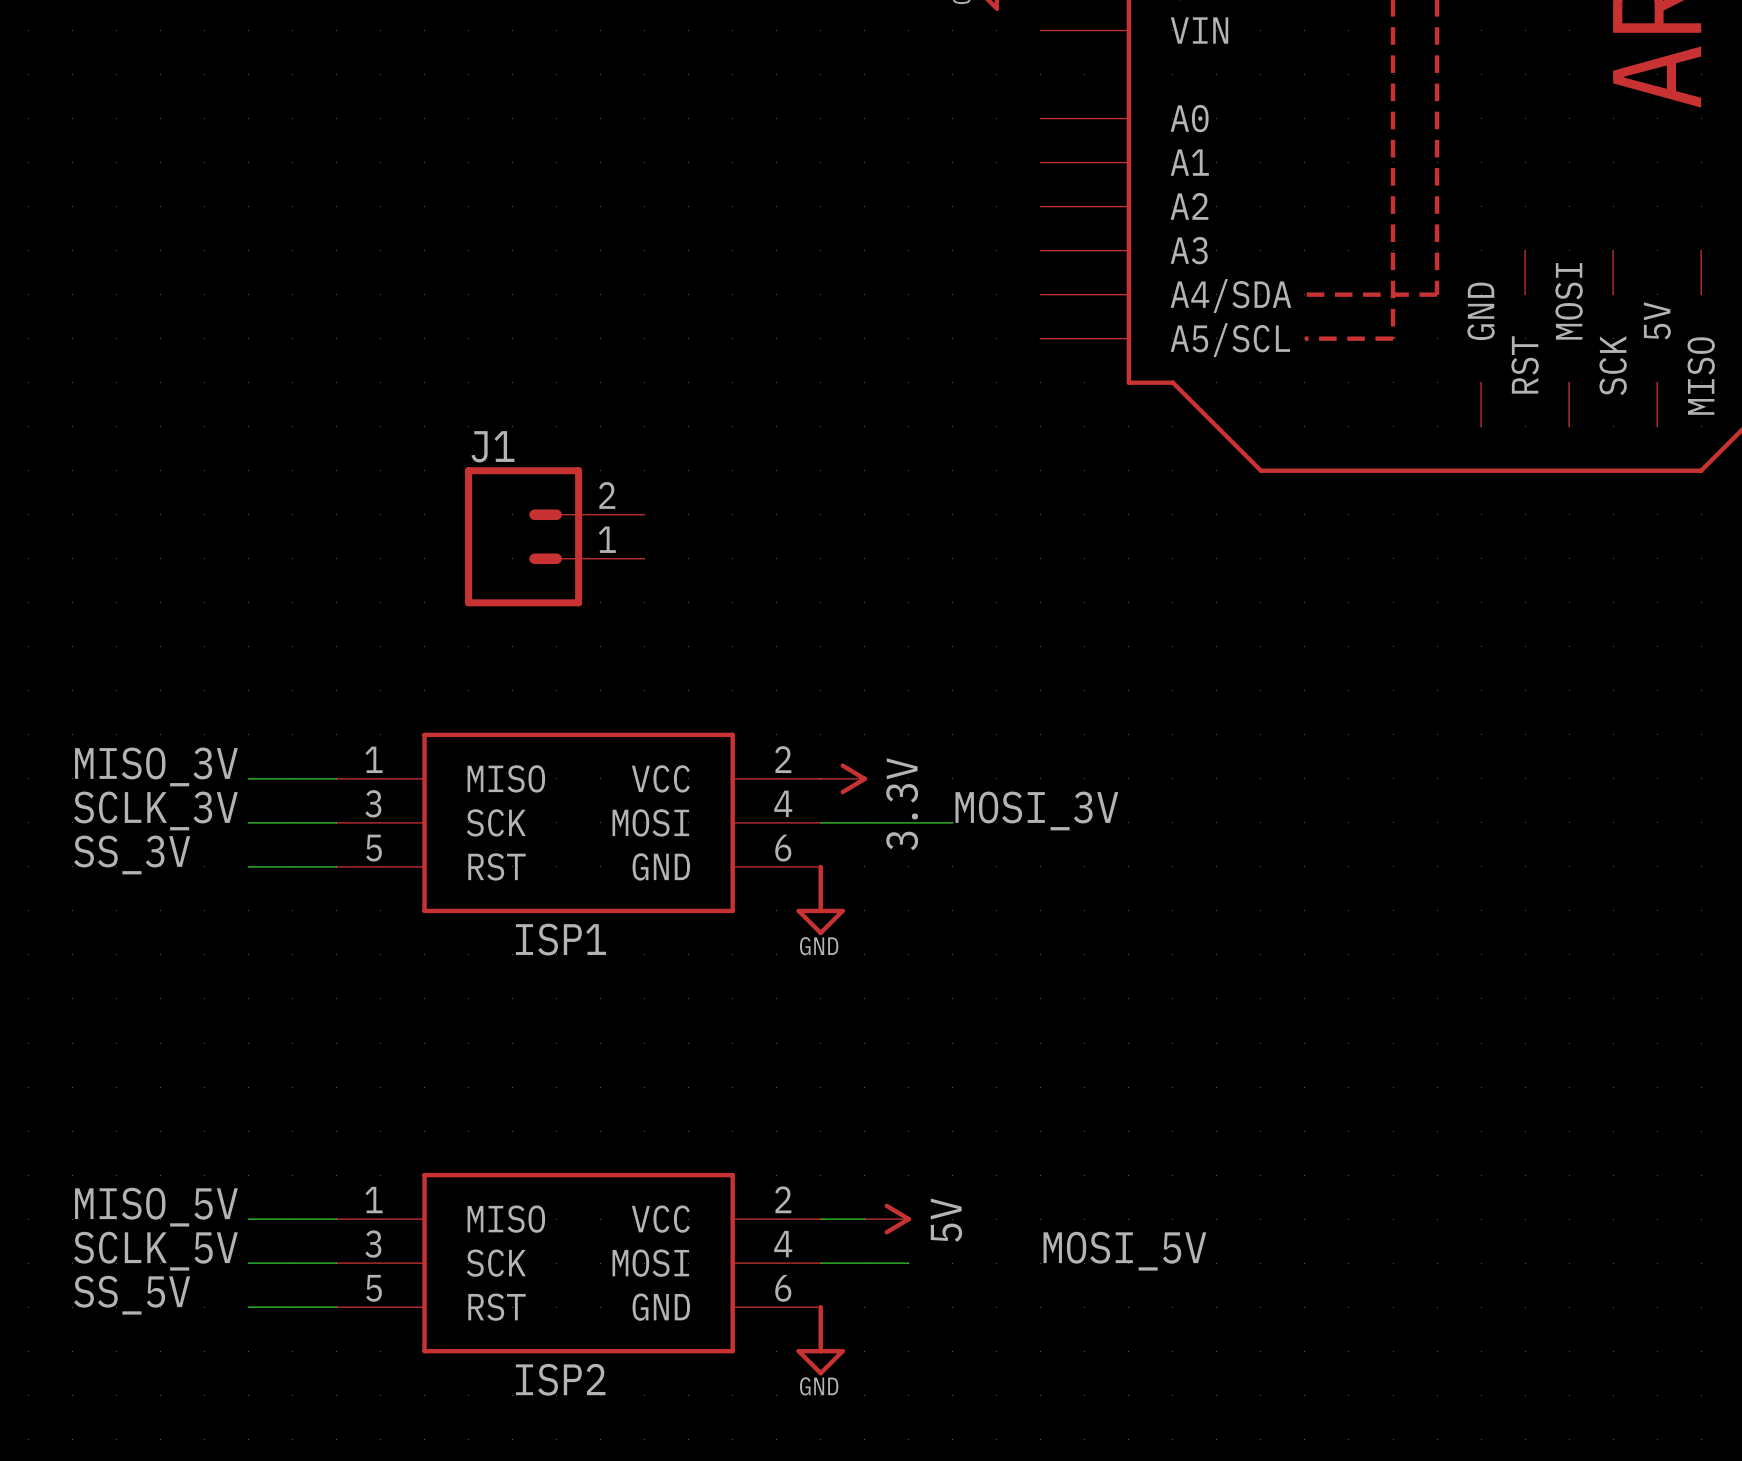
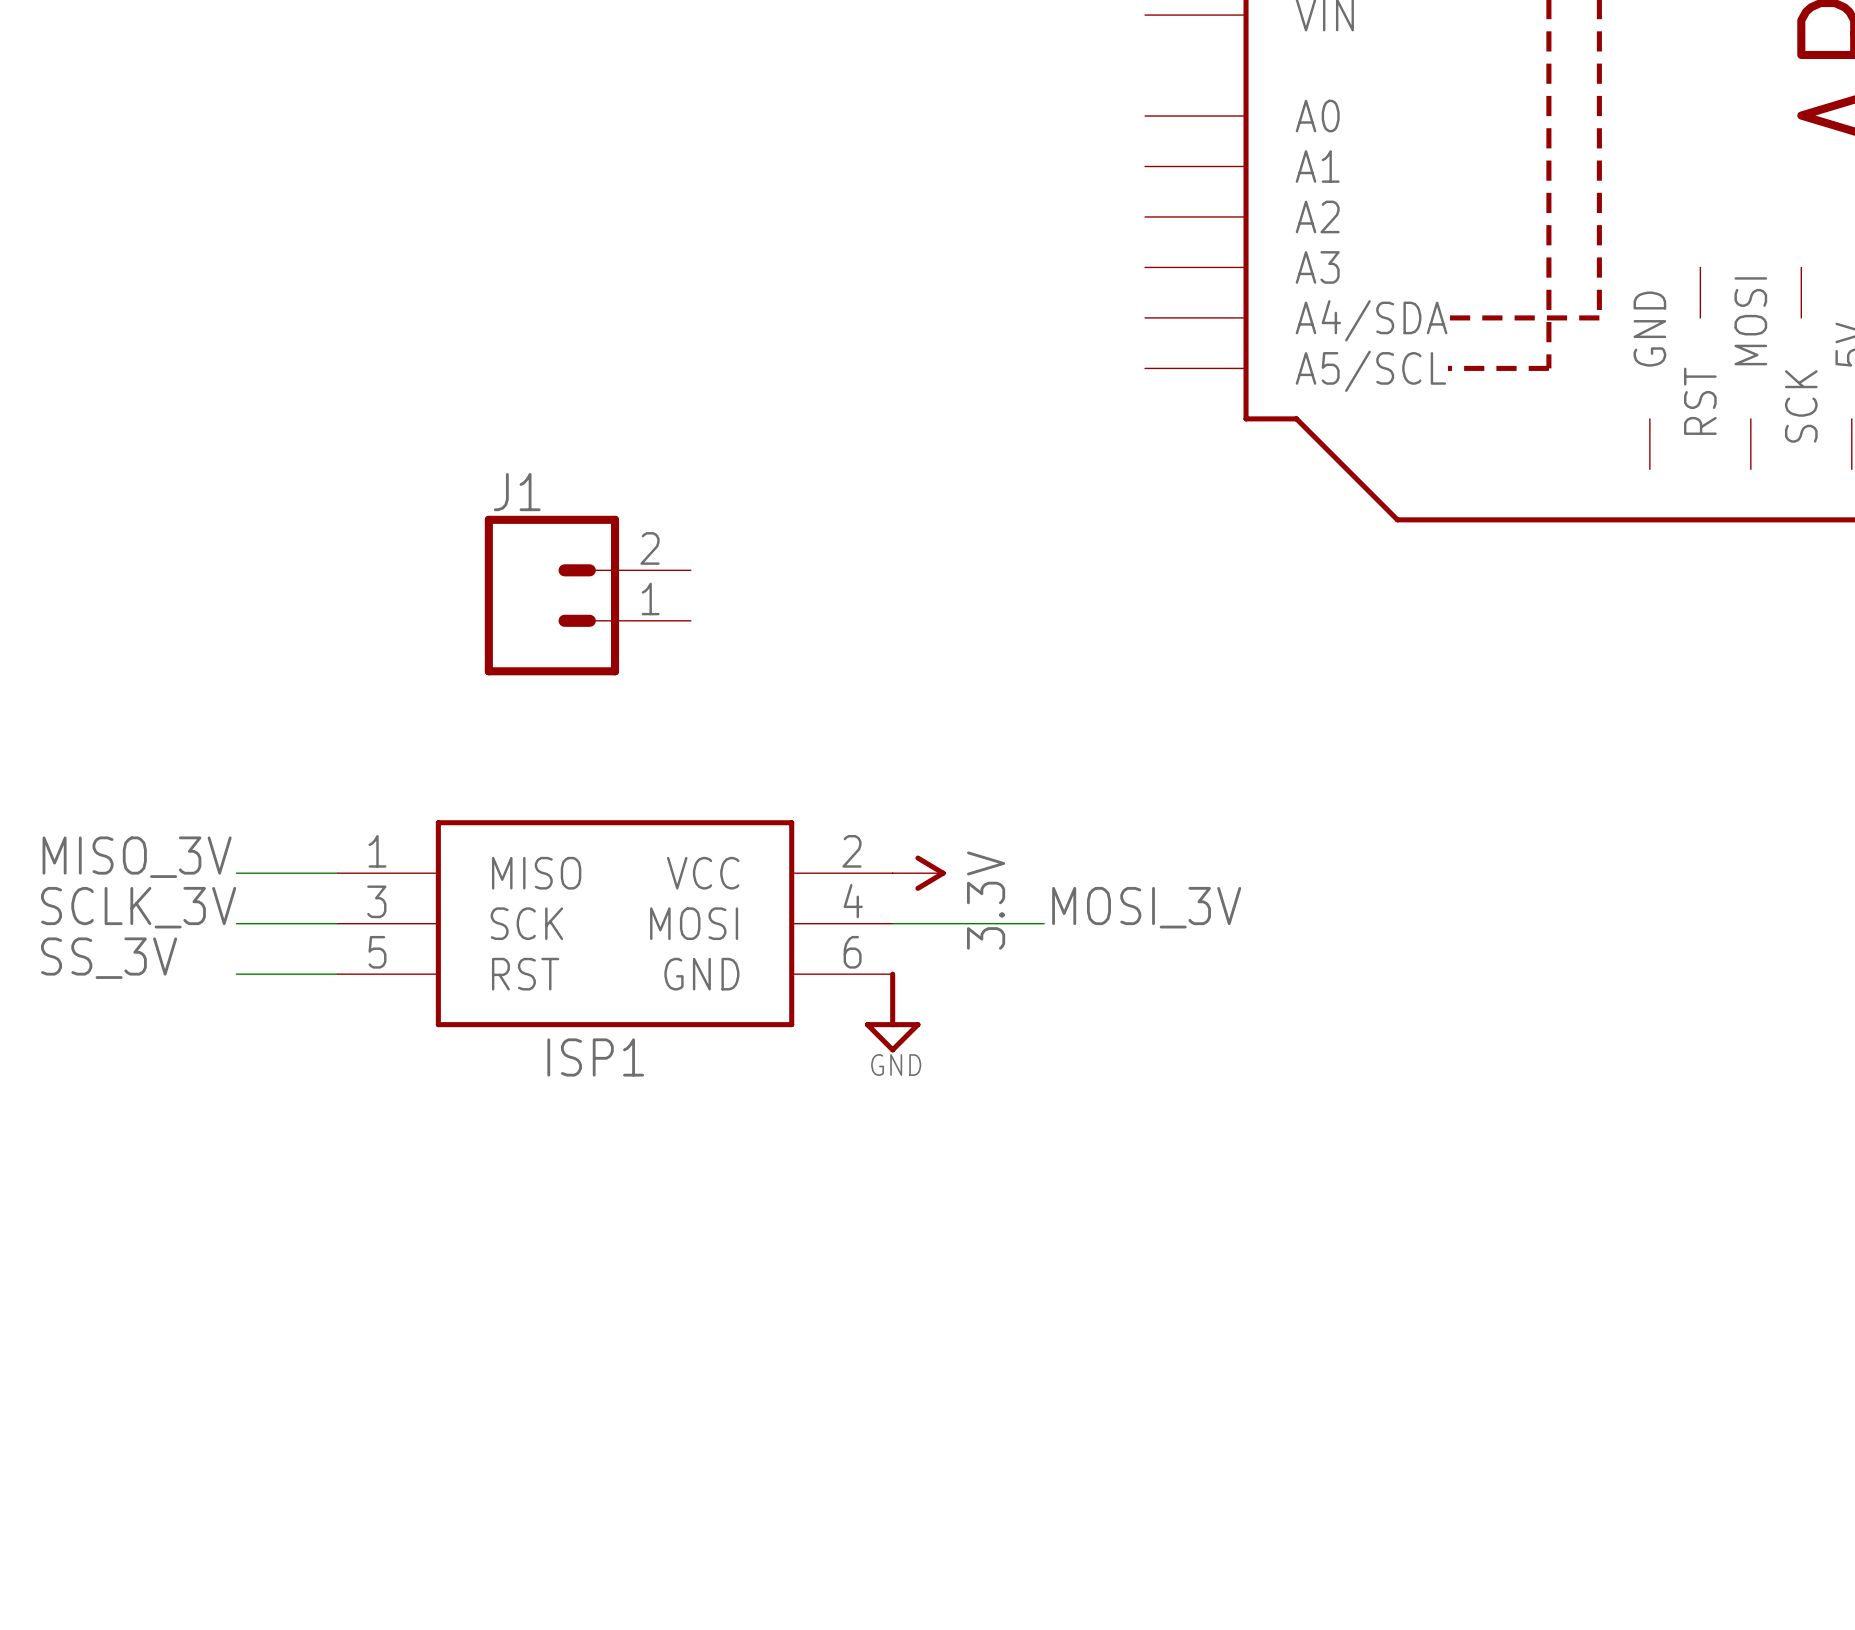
label: MISO_5V (156, 1207) -> none
wire: (248, 1219) (336, 1219) -> none
wire: (820, 1219) (864, 1219) -> none
power symbol: 5V (887, 1219) -> none
label: SCLK_5V (155, 1251) -> none
label: MOSI_5V (1124, 1251) -> none
wire: (248, 1263) (336, 1263) -> none
ISP2: (578, 1263) -> none
wire: (820, 1263) (908, 1263) -> none
label: SS_5V (132, 1295) -> none
wire: (248, 1307) (336, 1307) -> none
power symbol: GND (820, 1340) -> none

